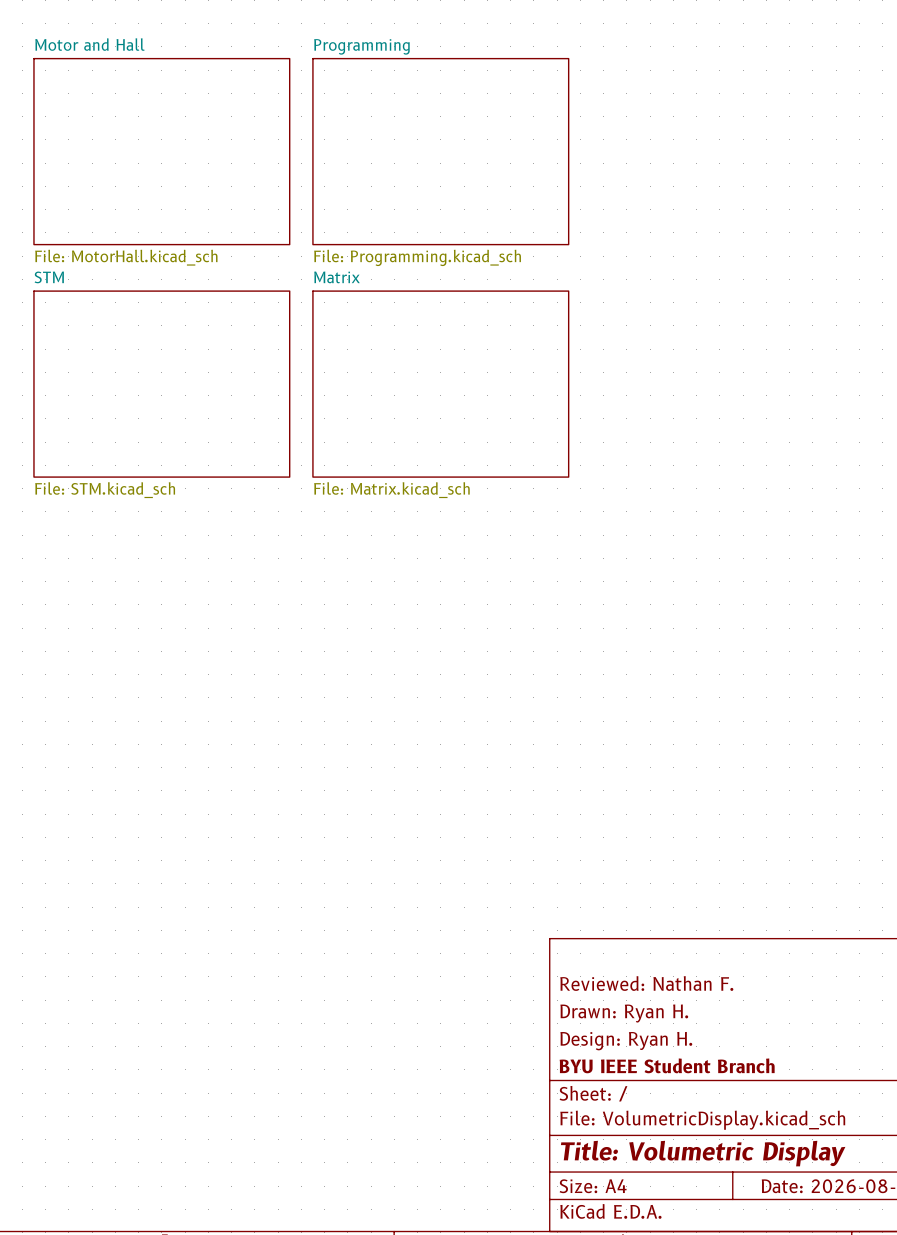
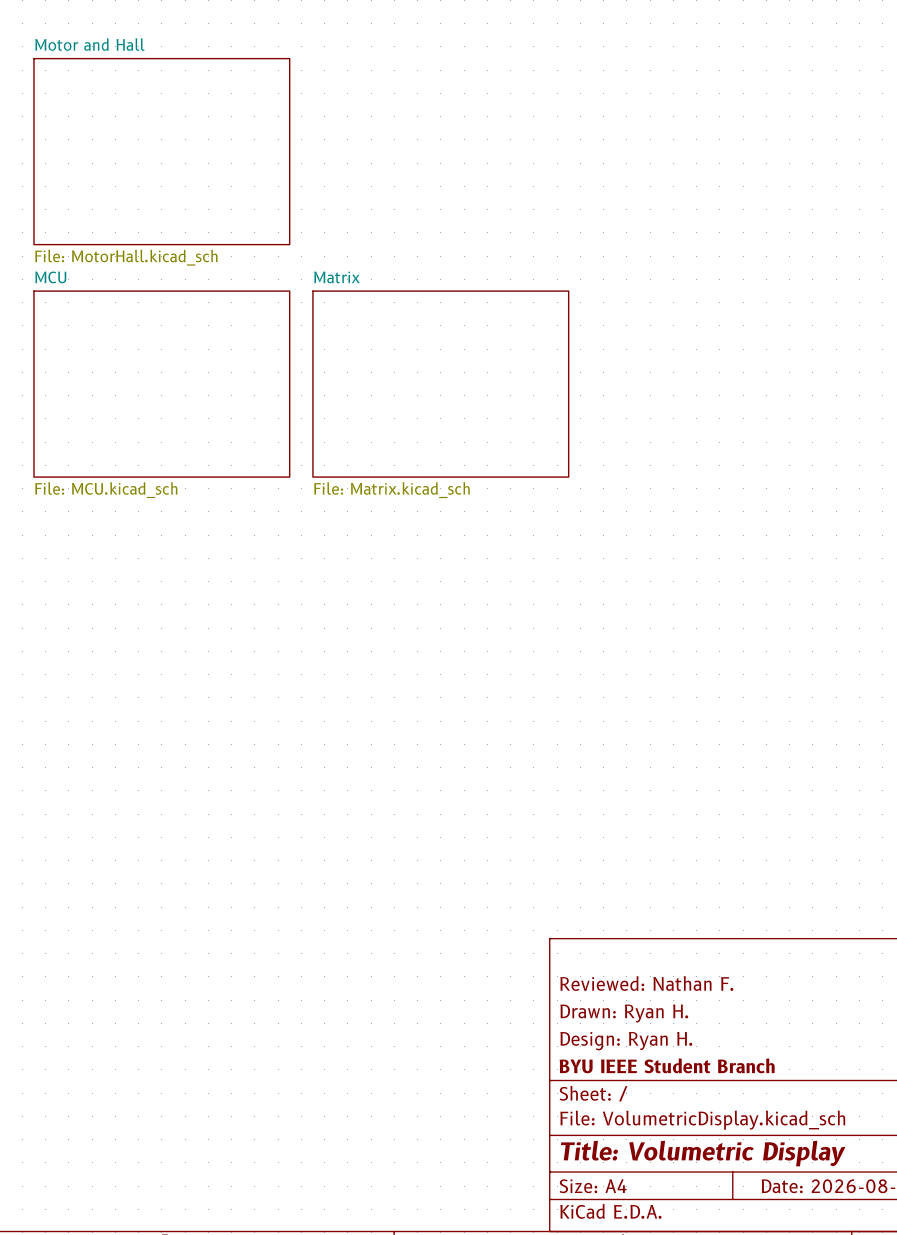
sheet Programming: File: Programming.kicad_sch (440, 151) -> none
sheet STM name: STM (49, 277) -> MCU (50, 277)
sheet STM value: File: STM.kicad_sch (105, 490) -> File: MCU.kicad_sch (106, 490)

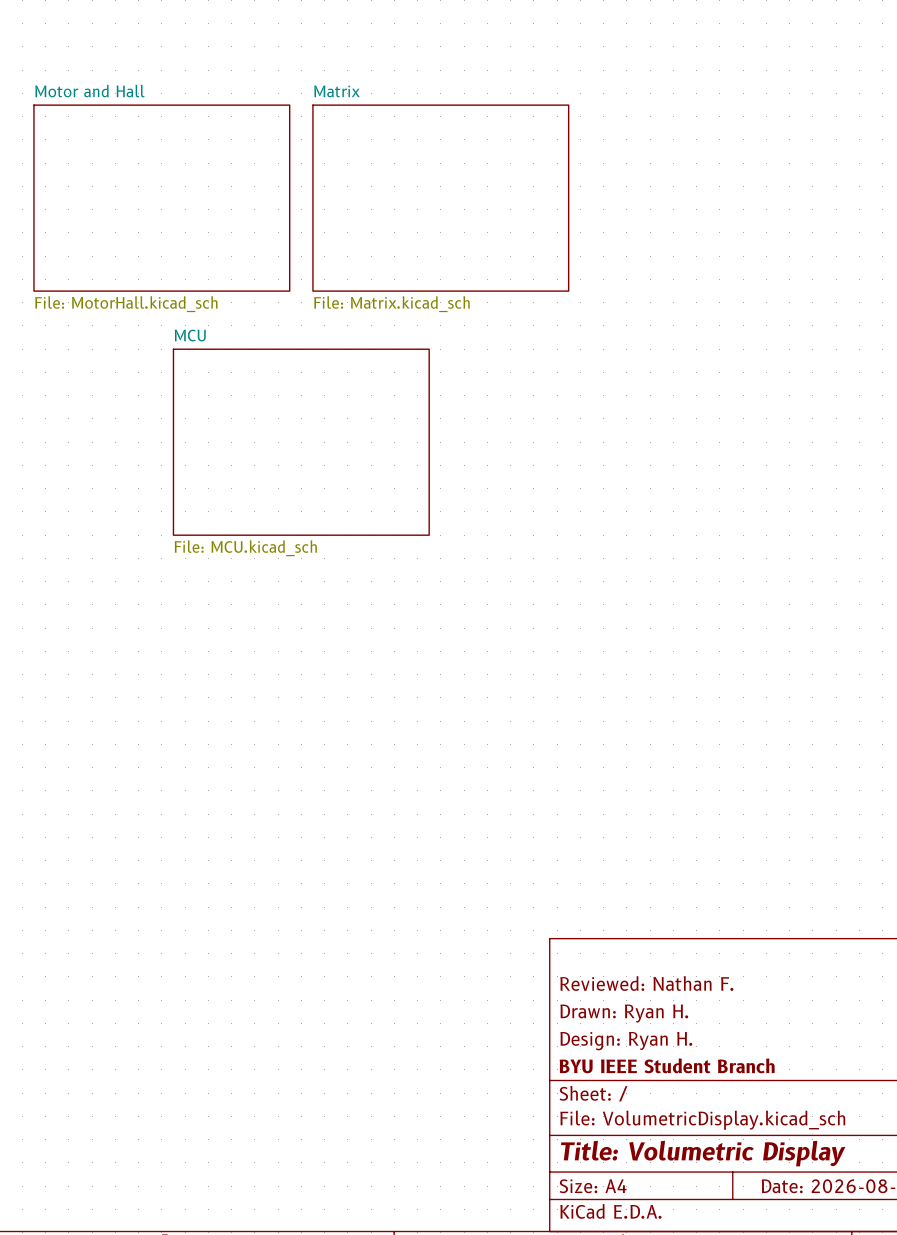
sheet Motor and Hall position: (161, 151) -> (161, 198)
sheet MCU position: (161, 384) -> (301, 442)
sheet Matrix position: (440, 384) -> (440, 198)

